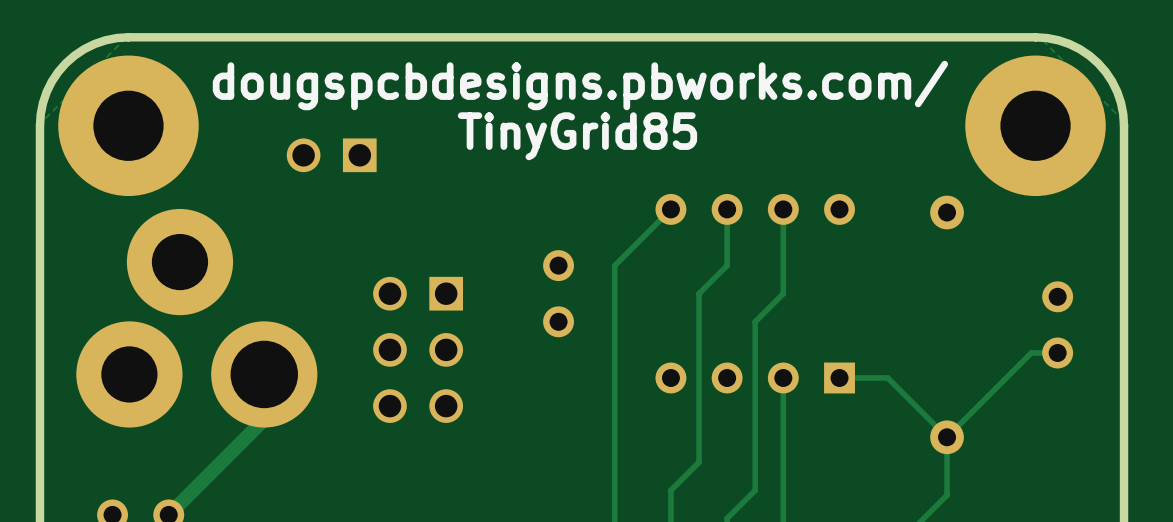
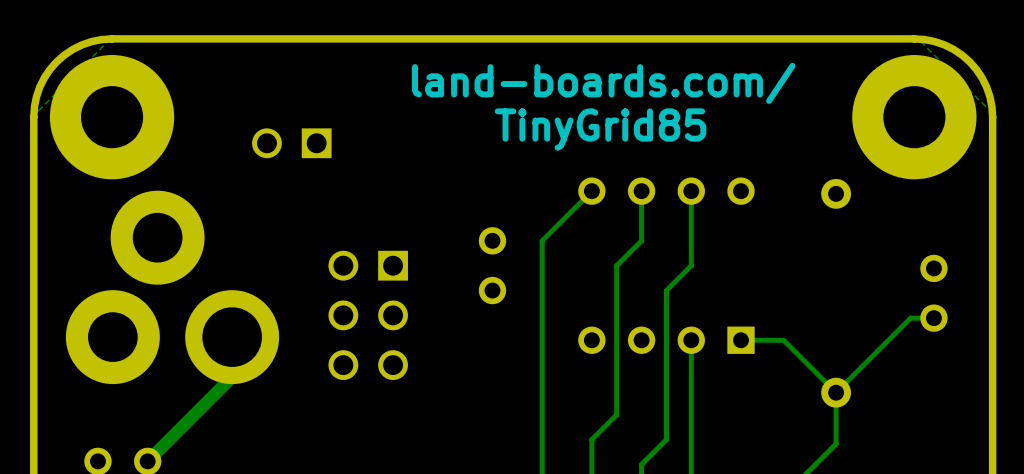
text: dougspcbdesigns.pbworks.com/ (580, 85) -> none
text: none -> land-boards.com/ (603, 83)
text position: TinyGrid85 (577, 136) -> TinyGrid85 (600, 129)

